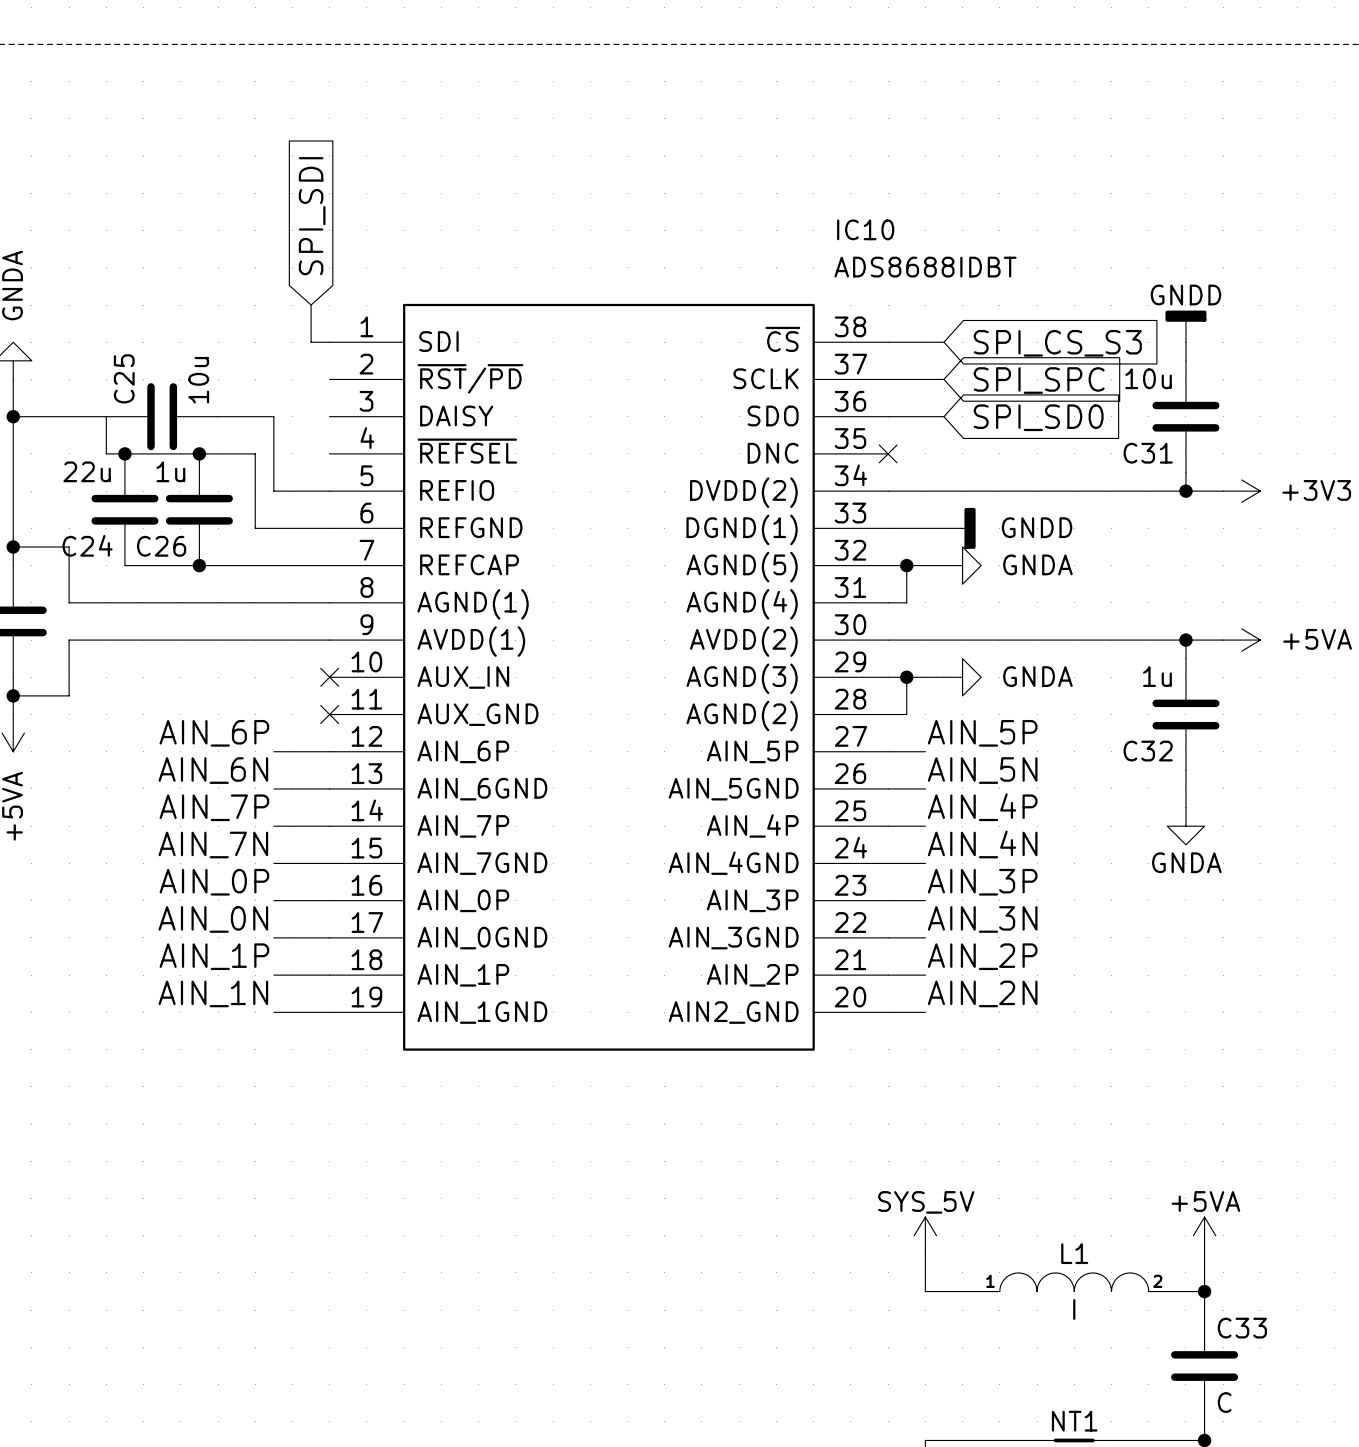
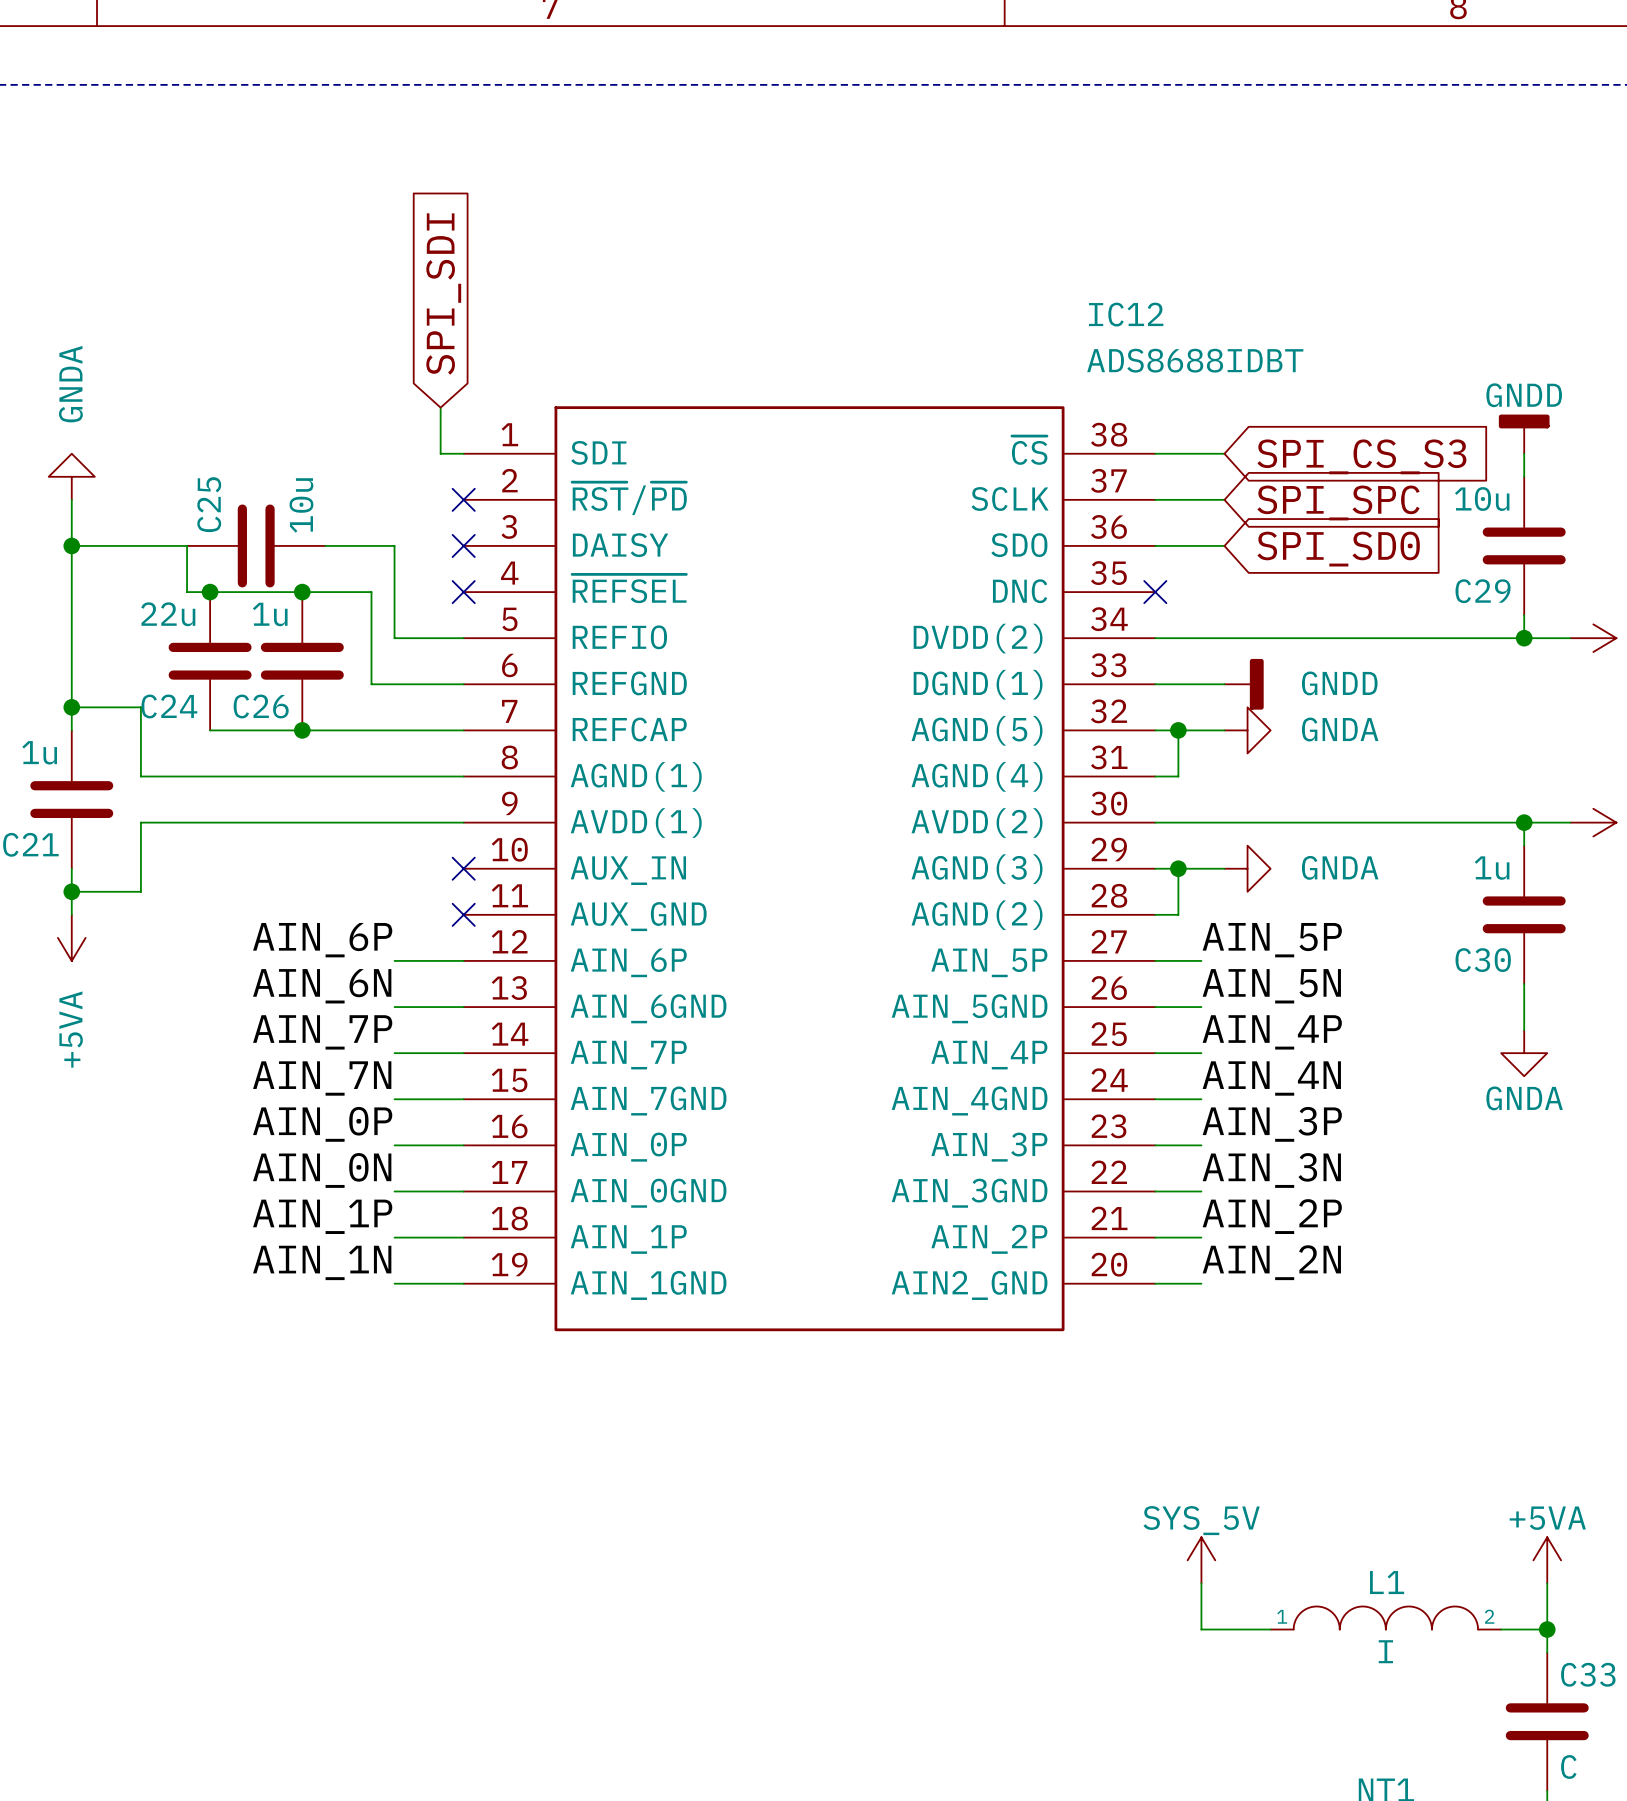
IC10 name: IC10 (865, 229) -> IC12 (1126, 314)
no-connect mark: none -> (463, 499)
no-connect mark: none -> (463, 545)
no-connect mark: none -> (463, 592)
C31 name: C31 (1148, 453) -> C29 (1483, 591)
C32 name: C32 (1148, 751) -> C30 (1483, 960)

